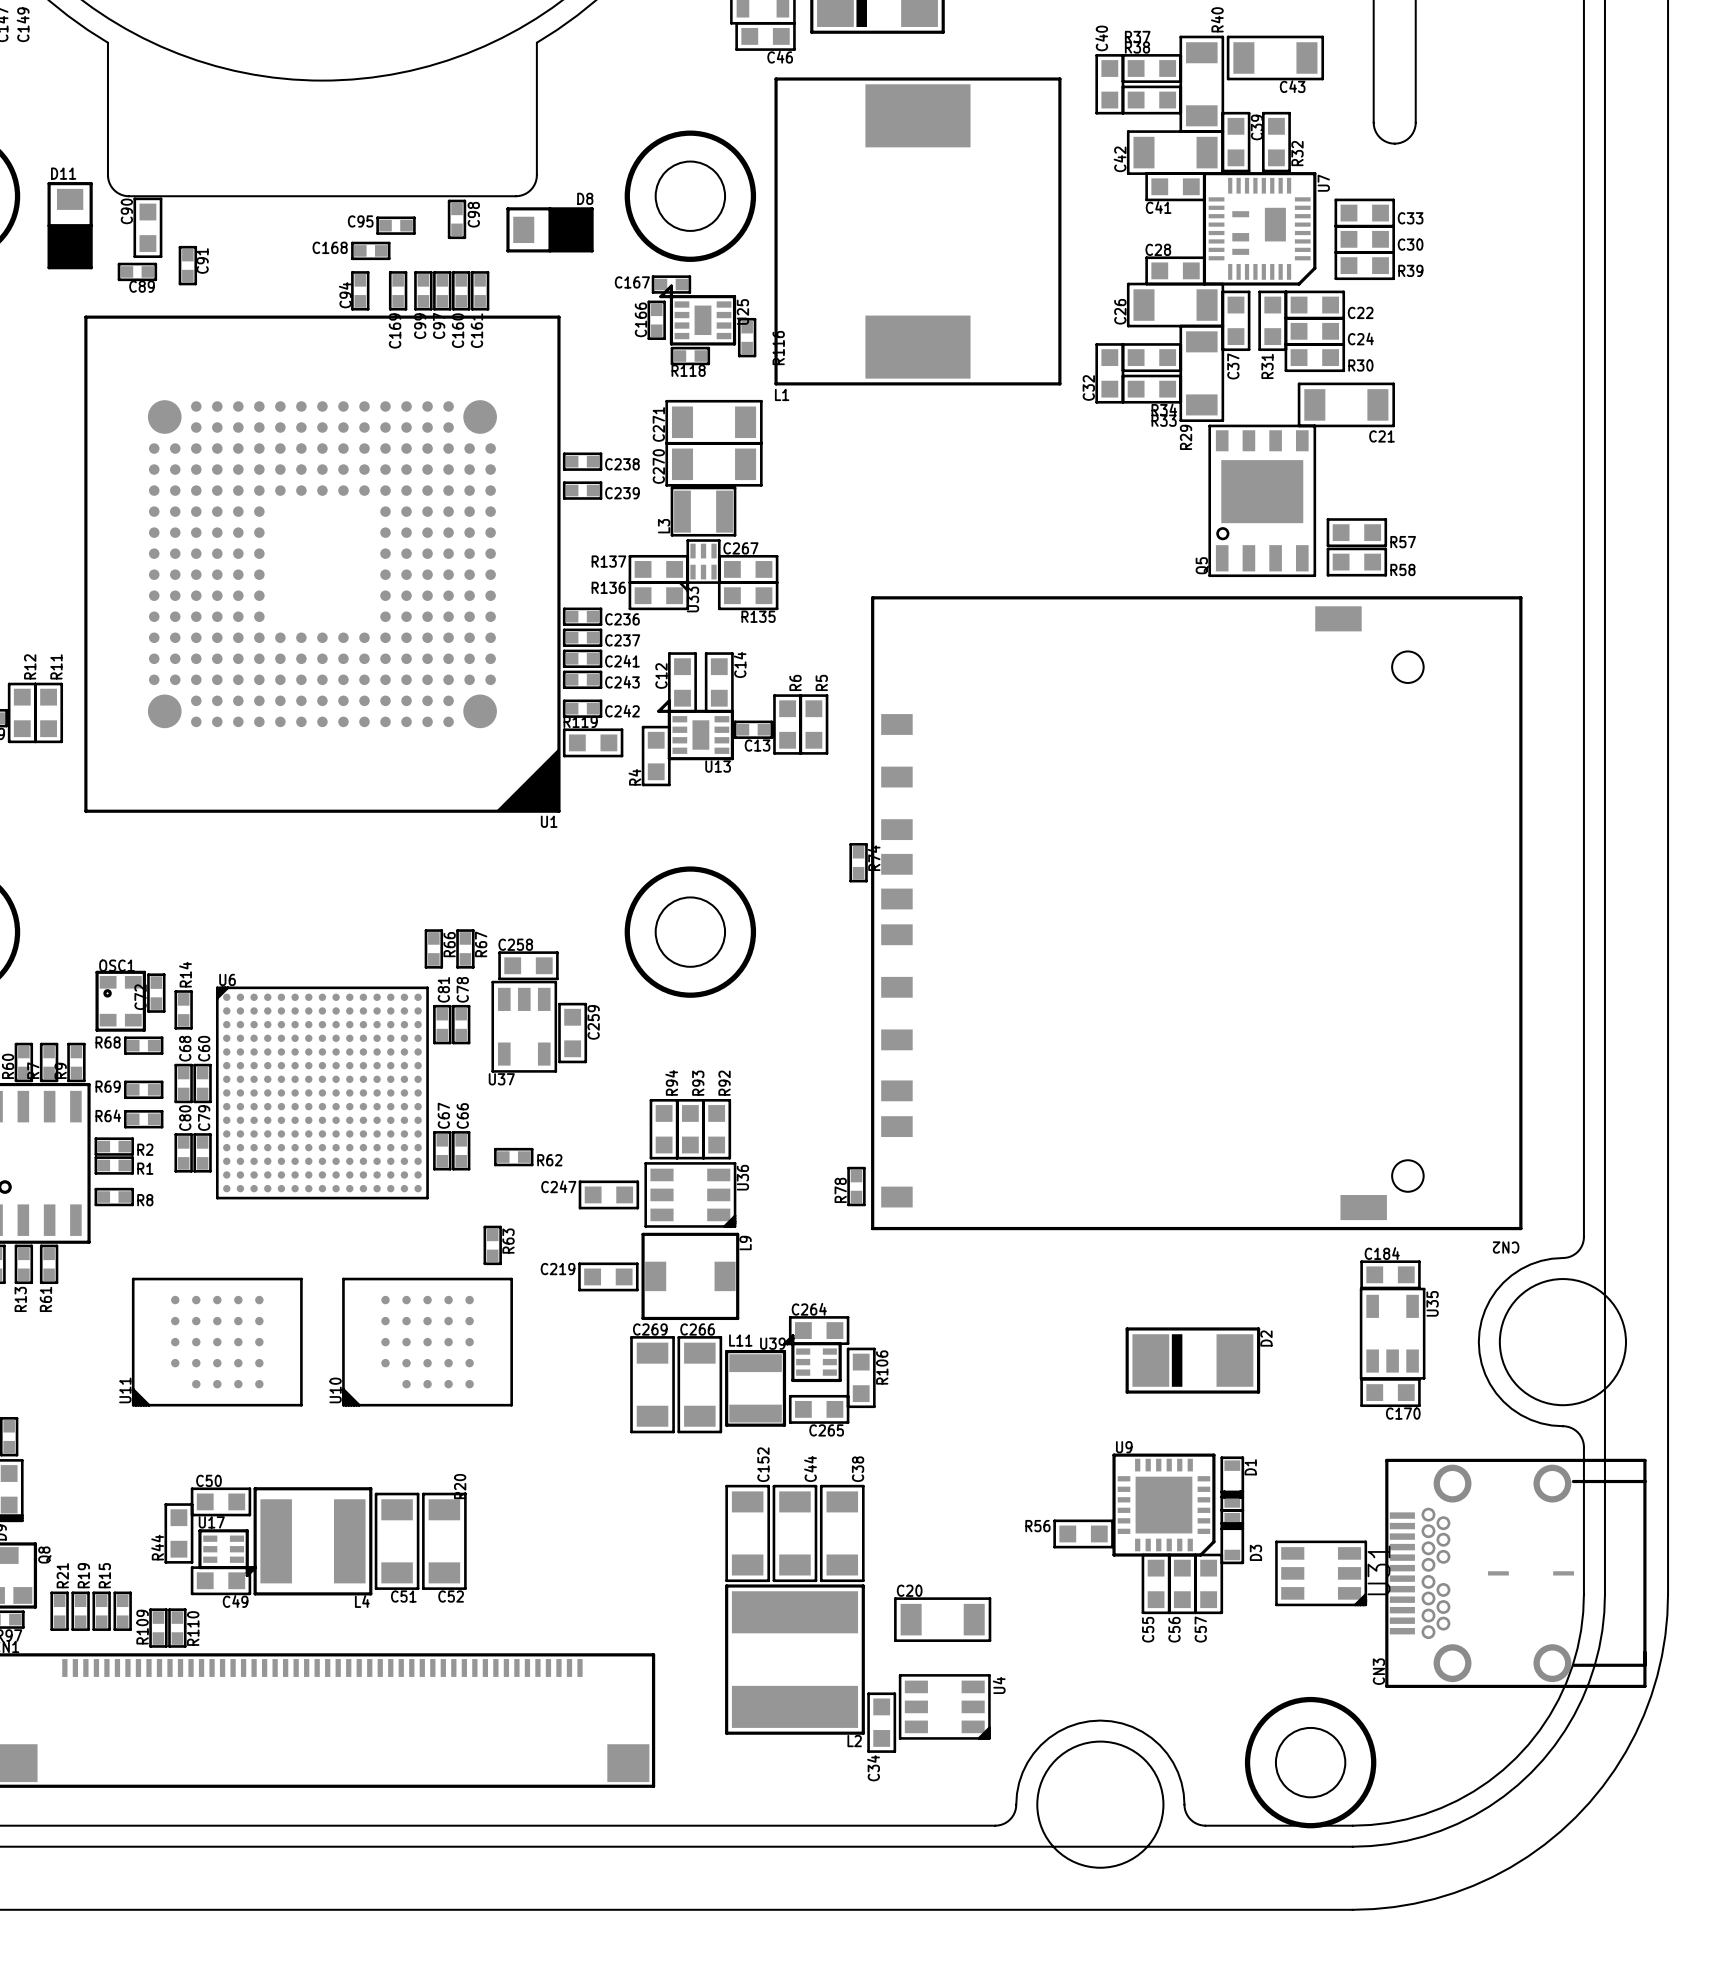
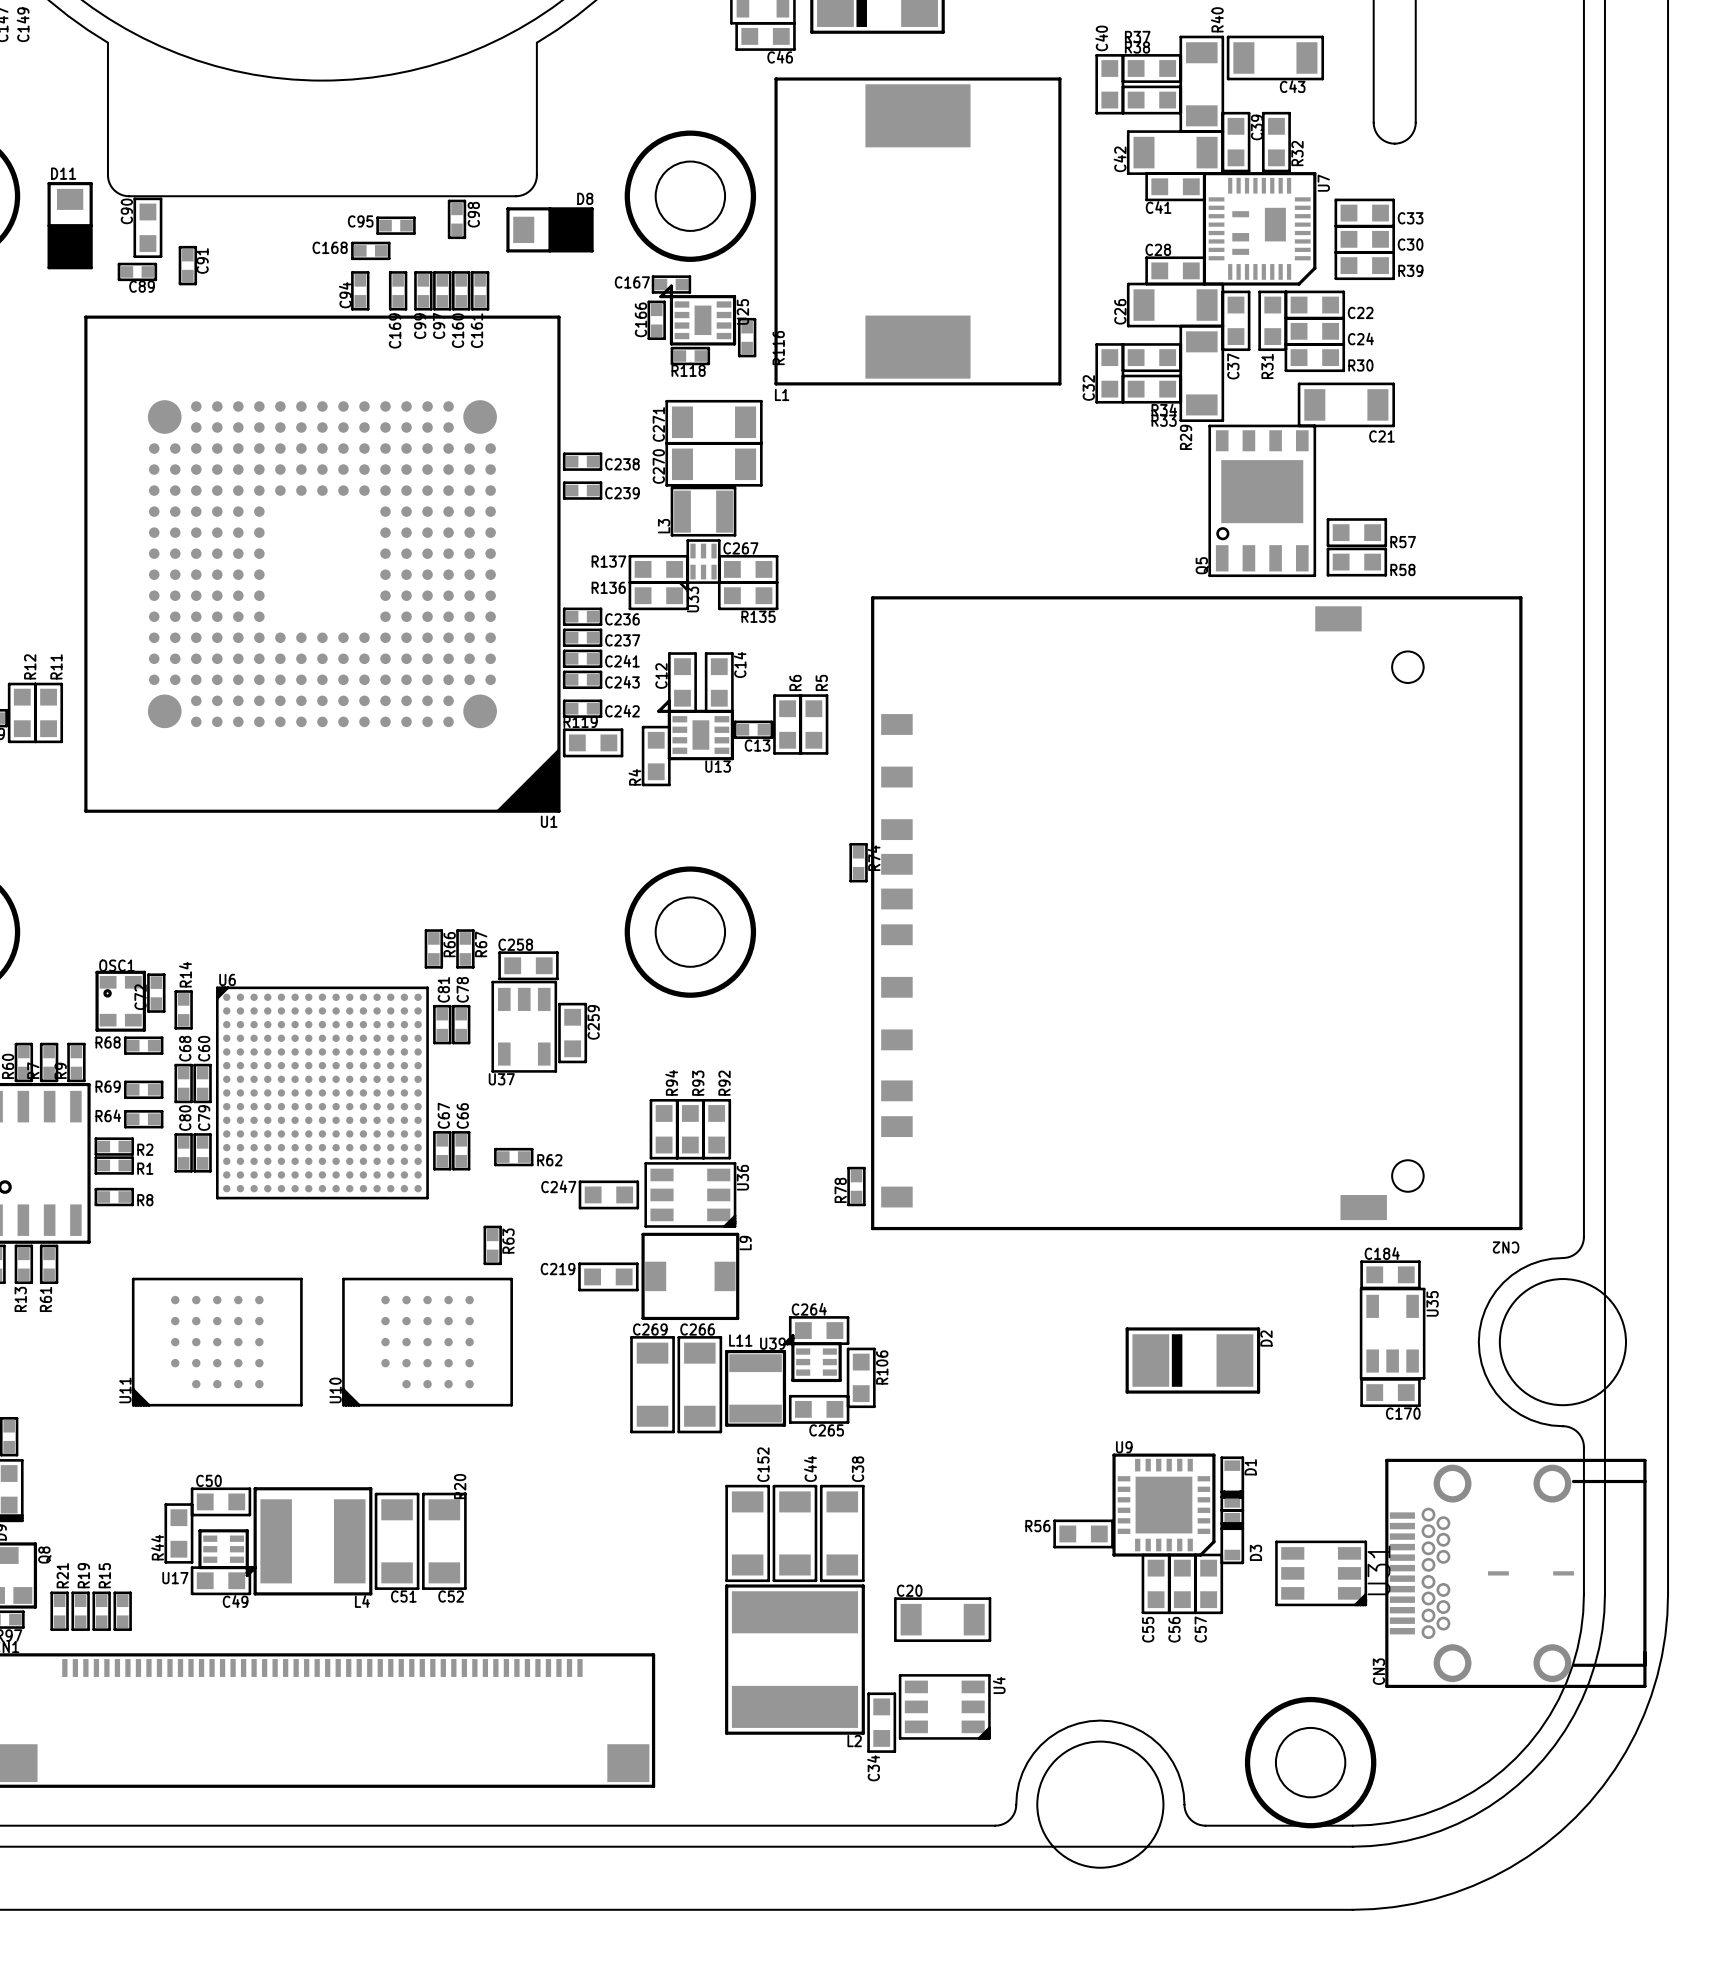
U17 name position: U17 (211, 1522) -> U17 (175, 1578)
R109: (158, 1628) -> none
R110: (177, 1628) -> none

